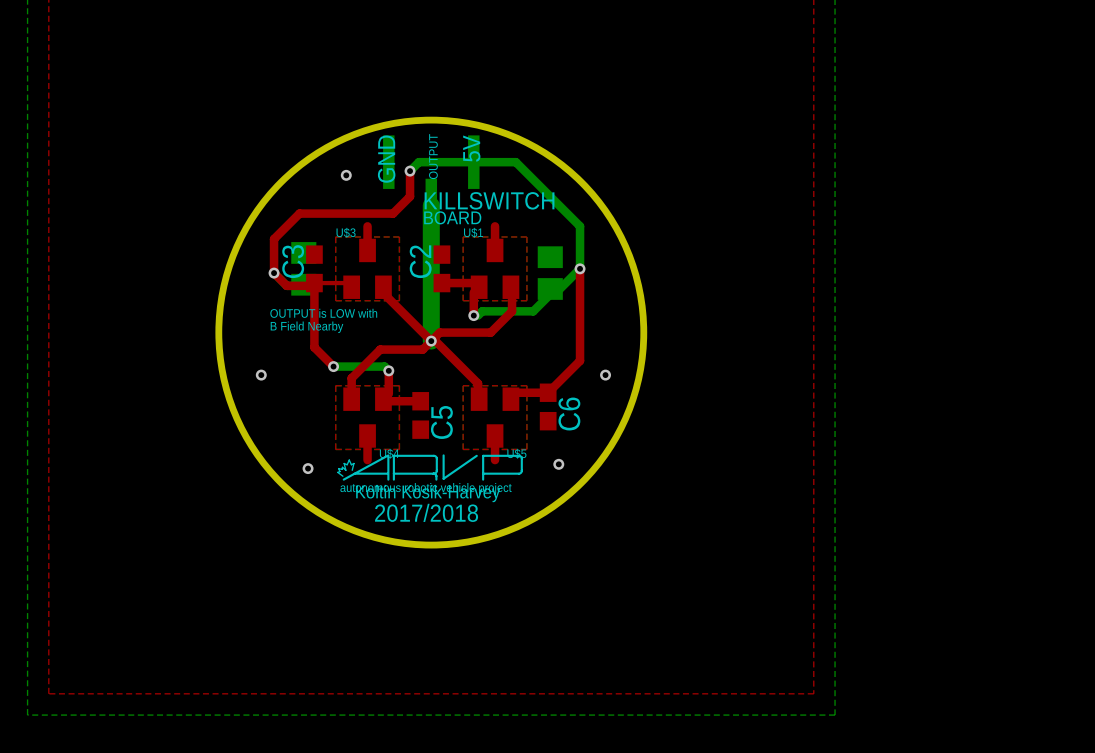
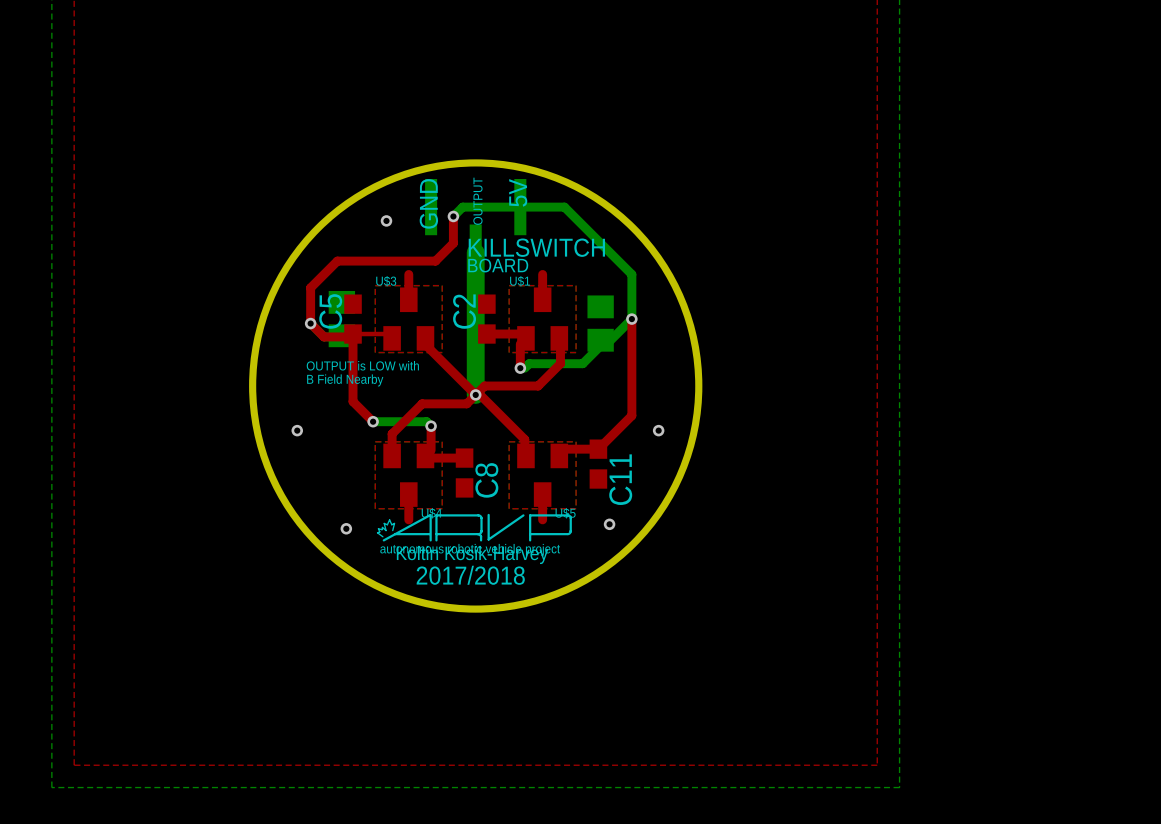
C3 name: C3 (293, 261) -> C5 (330, 311)
C6 name: C6 (569, 414) -> C11 (620, 479)
C5 name: C5 (441, 422) -> C8 (486, 480)

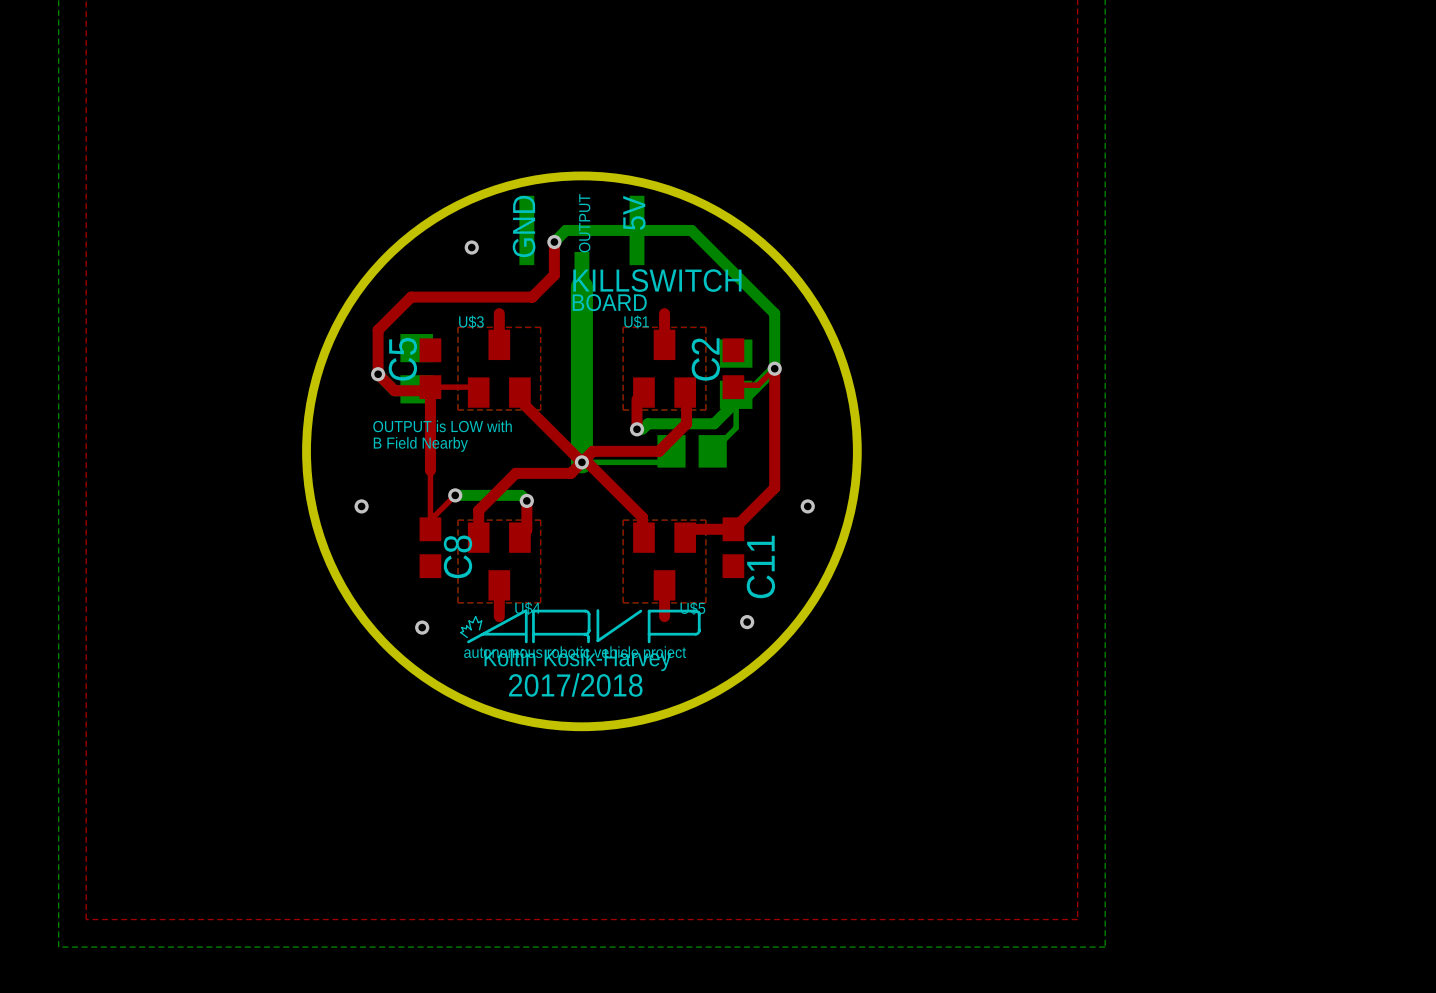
C2 position: (486, 319) -> (733, 368)
top track: none -> (774, 368) (758, 385) (735, 385) (733, 387)
top track: (486, 334) (521, 334) (525, 338) -> none
bottom track: none -> (736, 401) (736, 427) (712, 451)
bottom track: none -> (671, 451) (660, 462) (581, 462)
part: none -> (692, 451)
top track: (353, 401) (373, 421) -> (430, 470) (430, 529)
top track: none -> (455, 495) (430, 520)
top track: (425, 455) (427, 458) (464, 458) -> none
C8 position: (464, 473) -> (430, 547)

